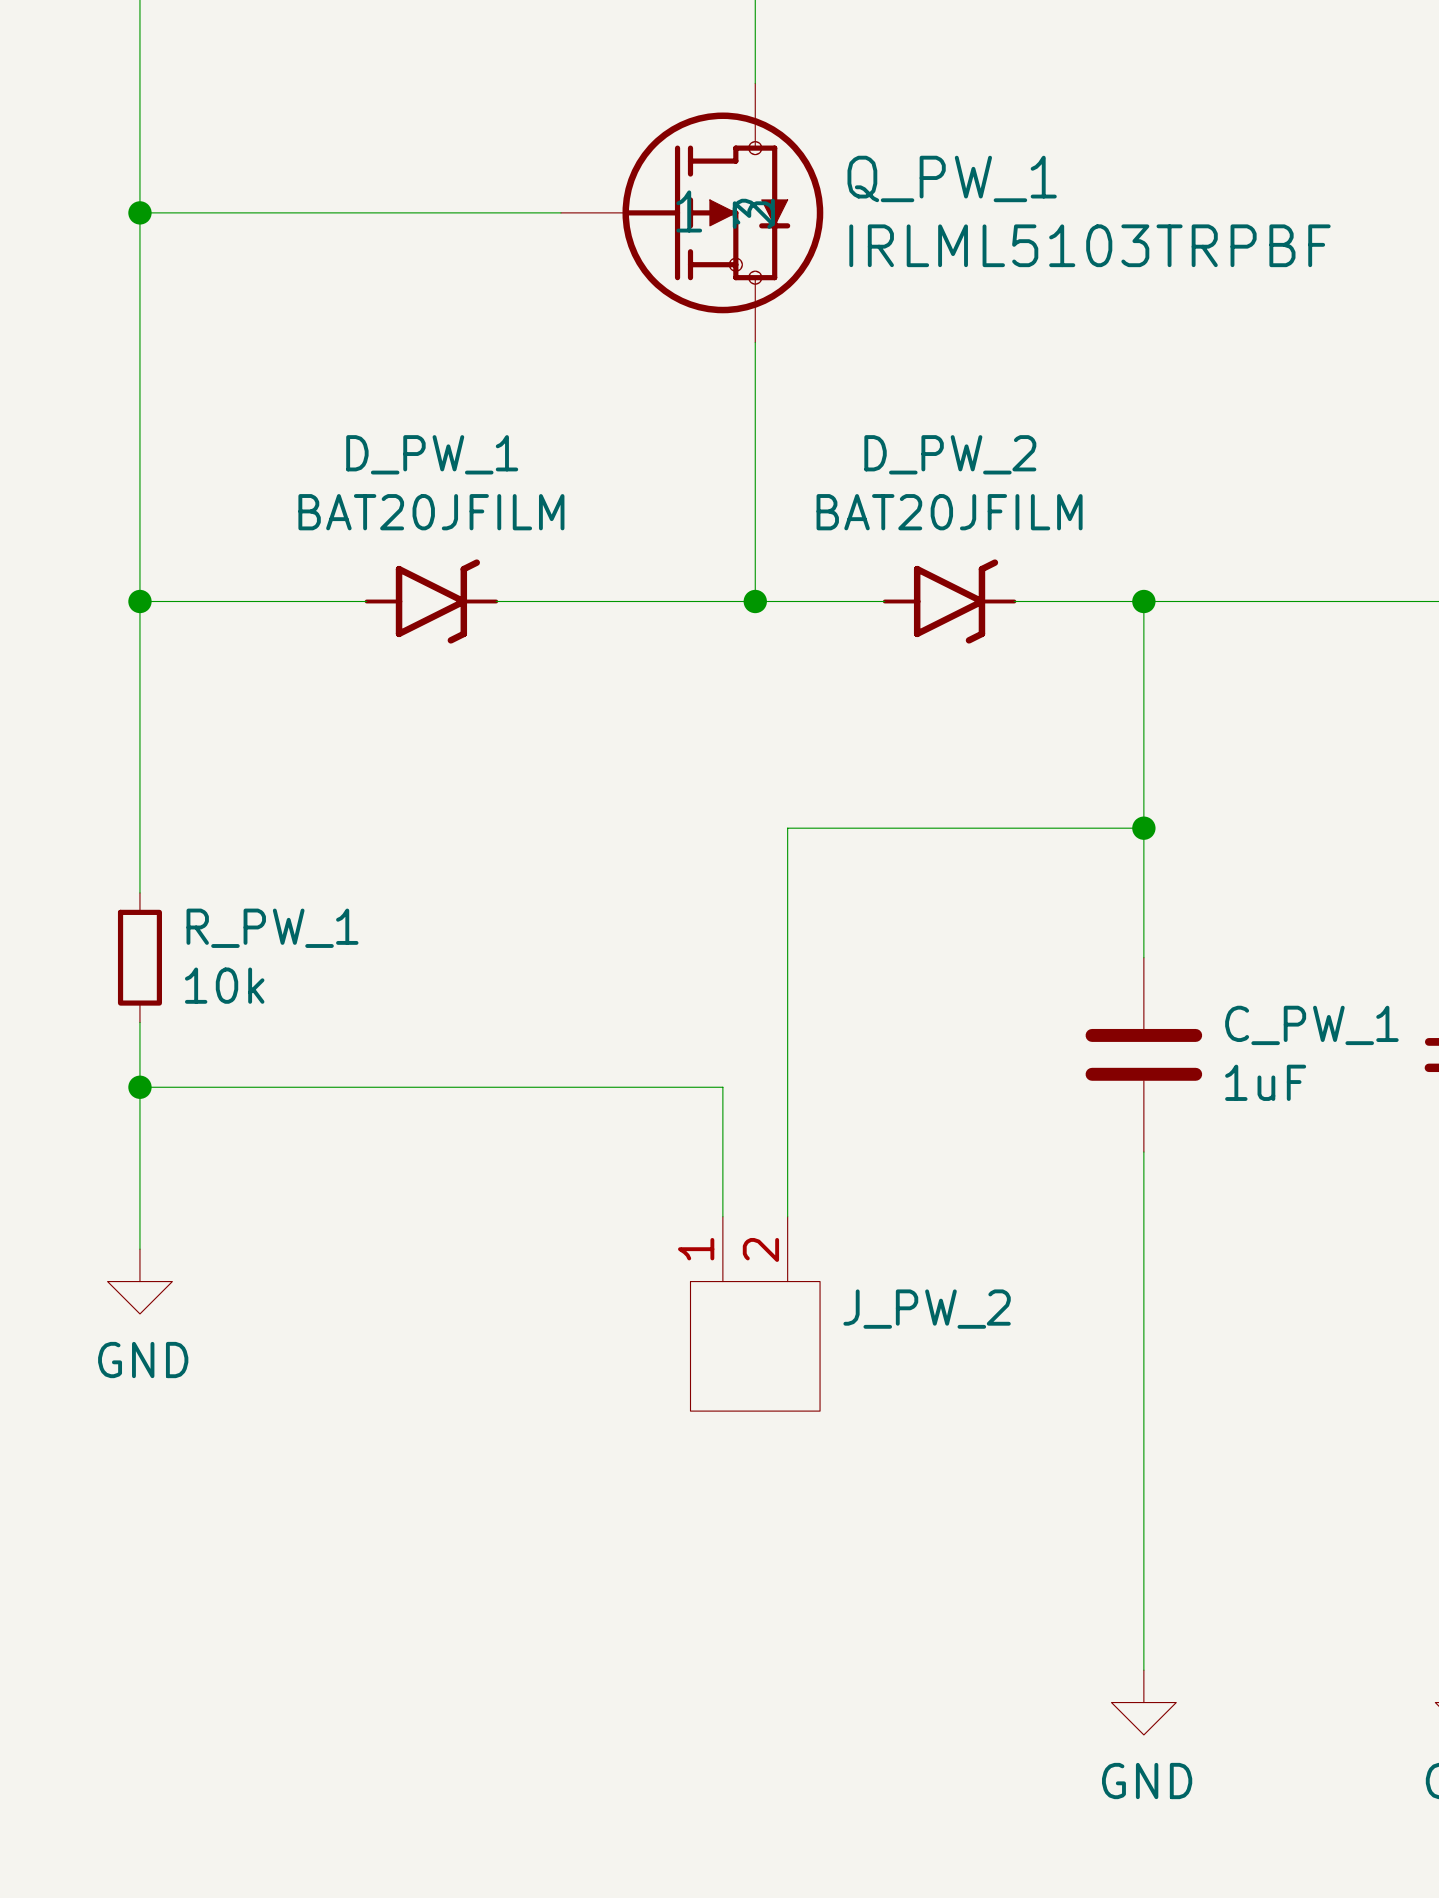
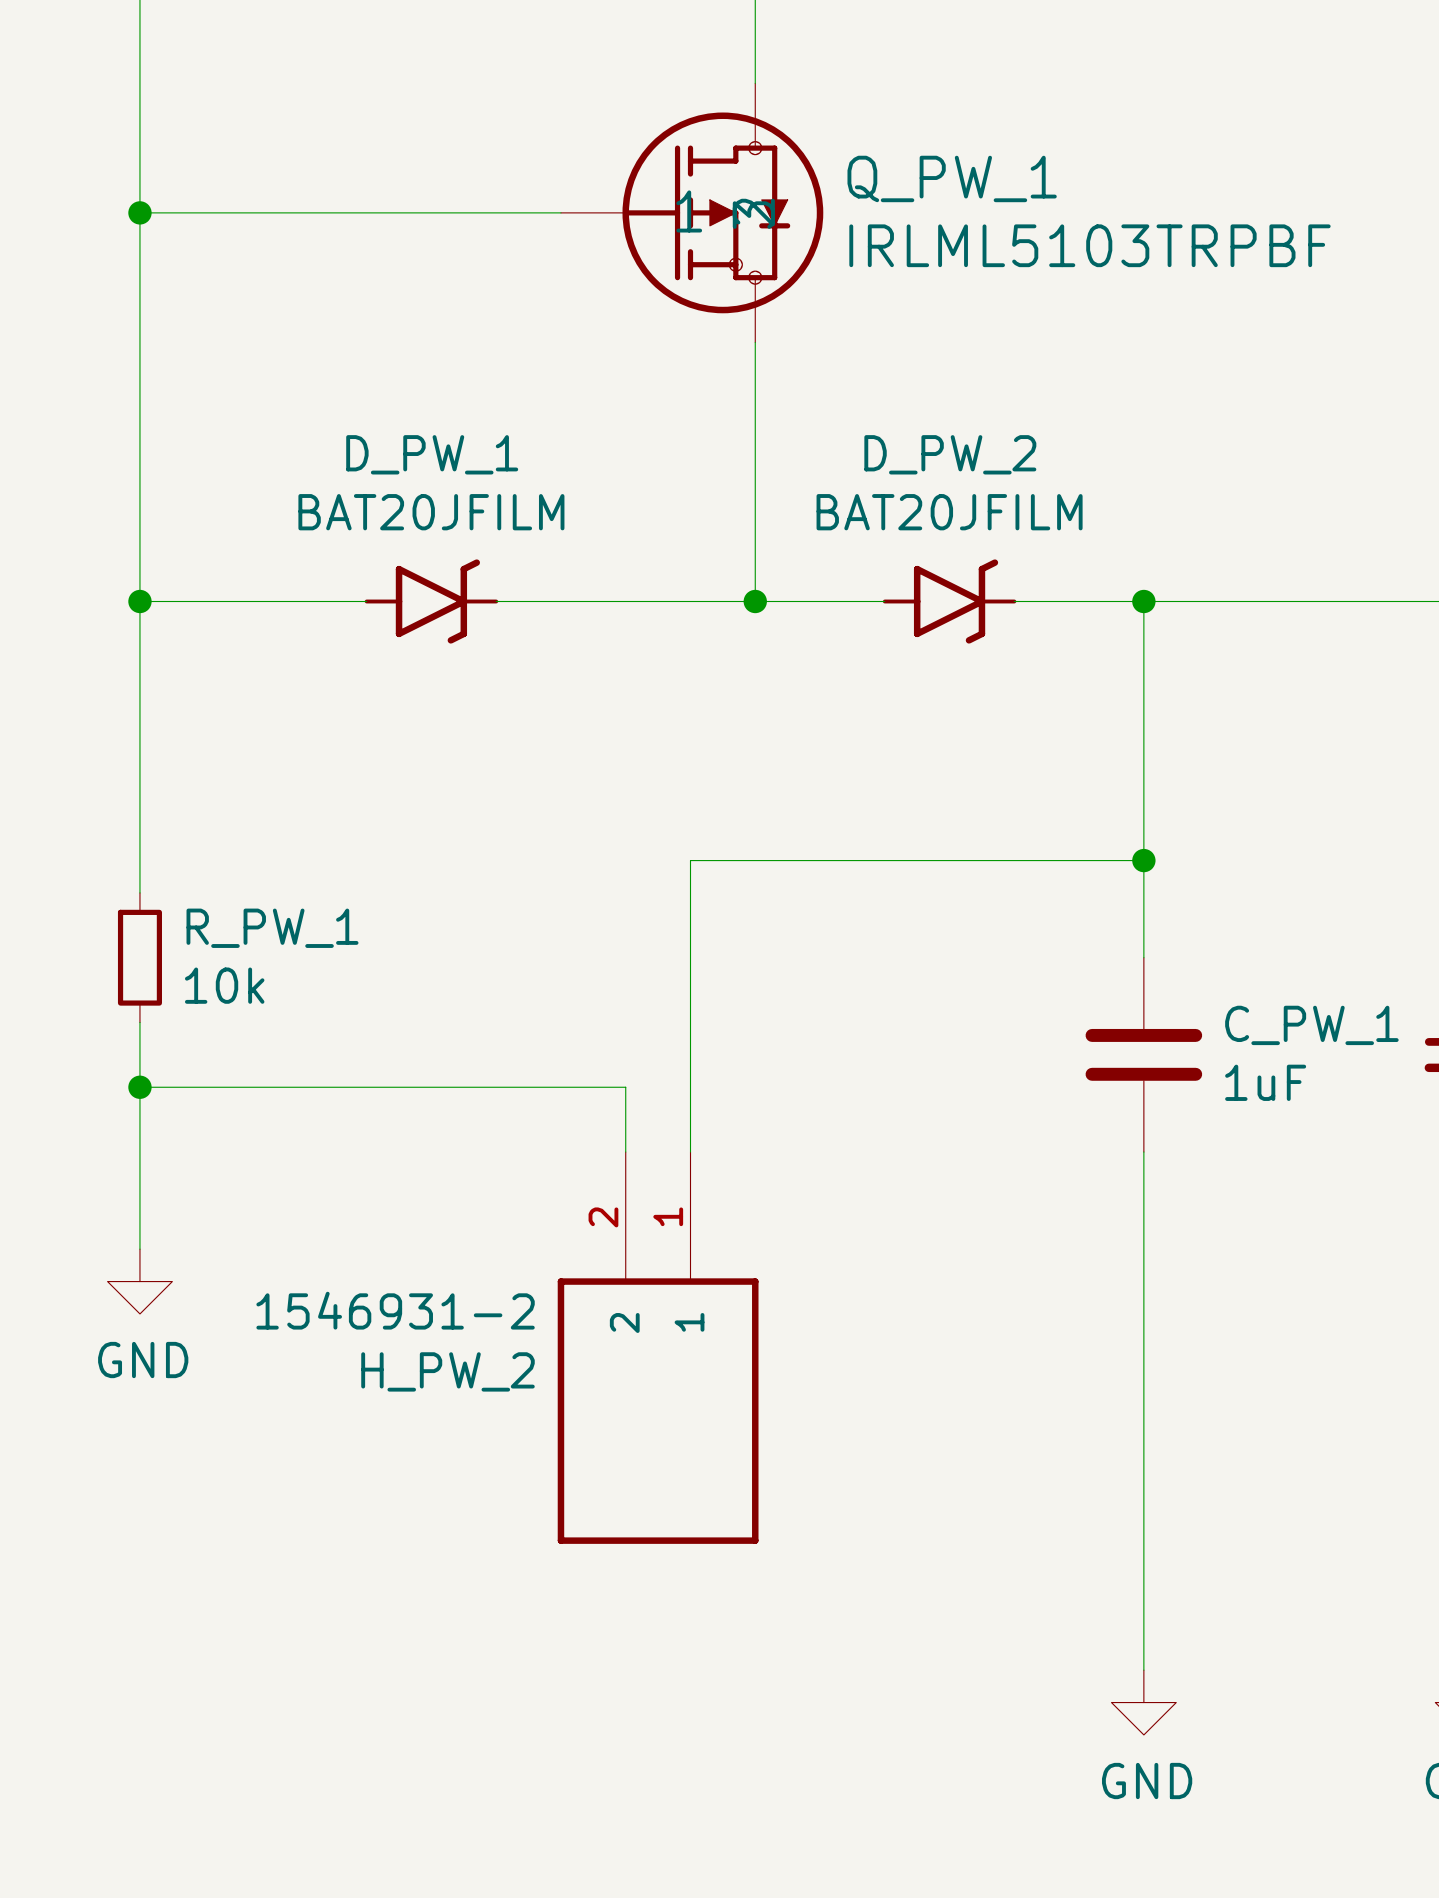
wire: (1143, 828) (787, 828) (787, 1216) -> none
junction position: (1143, 828) -> (1143, 860)
wire: none -> (1143, 860) (690, 860) (690, 1152)
wire: (625, 1087) (722, 1087) (722, 1216) -> (625, 1087) (625, 1152)
J_PW_2: (755, 1313) -> none
H_PW_2: none -> 1546931-2 (658, 1347)

